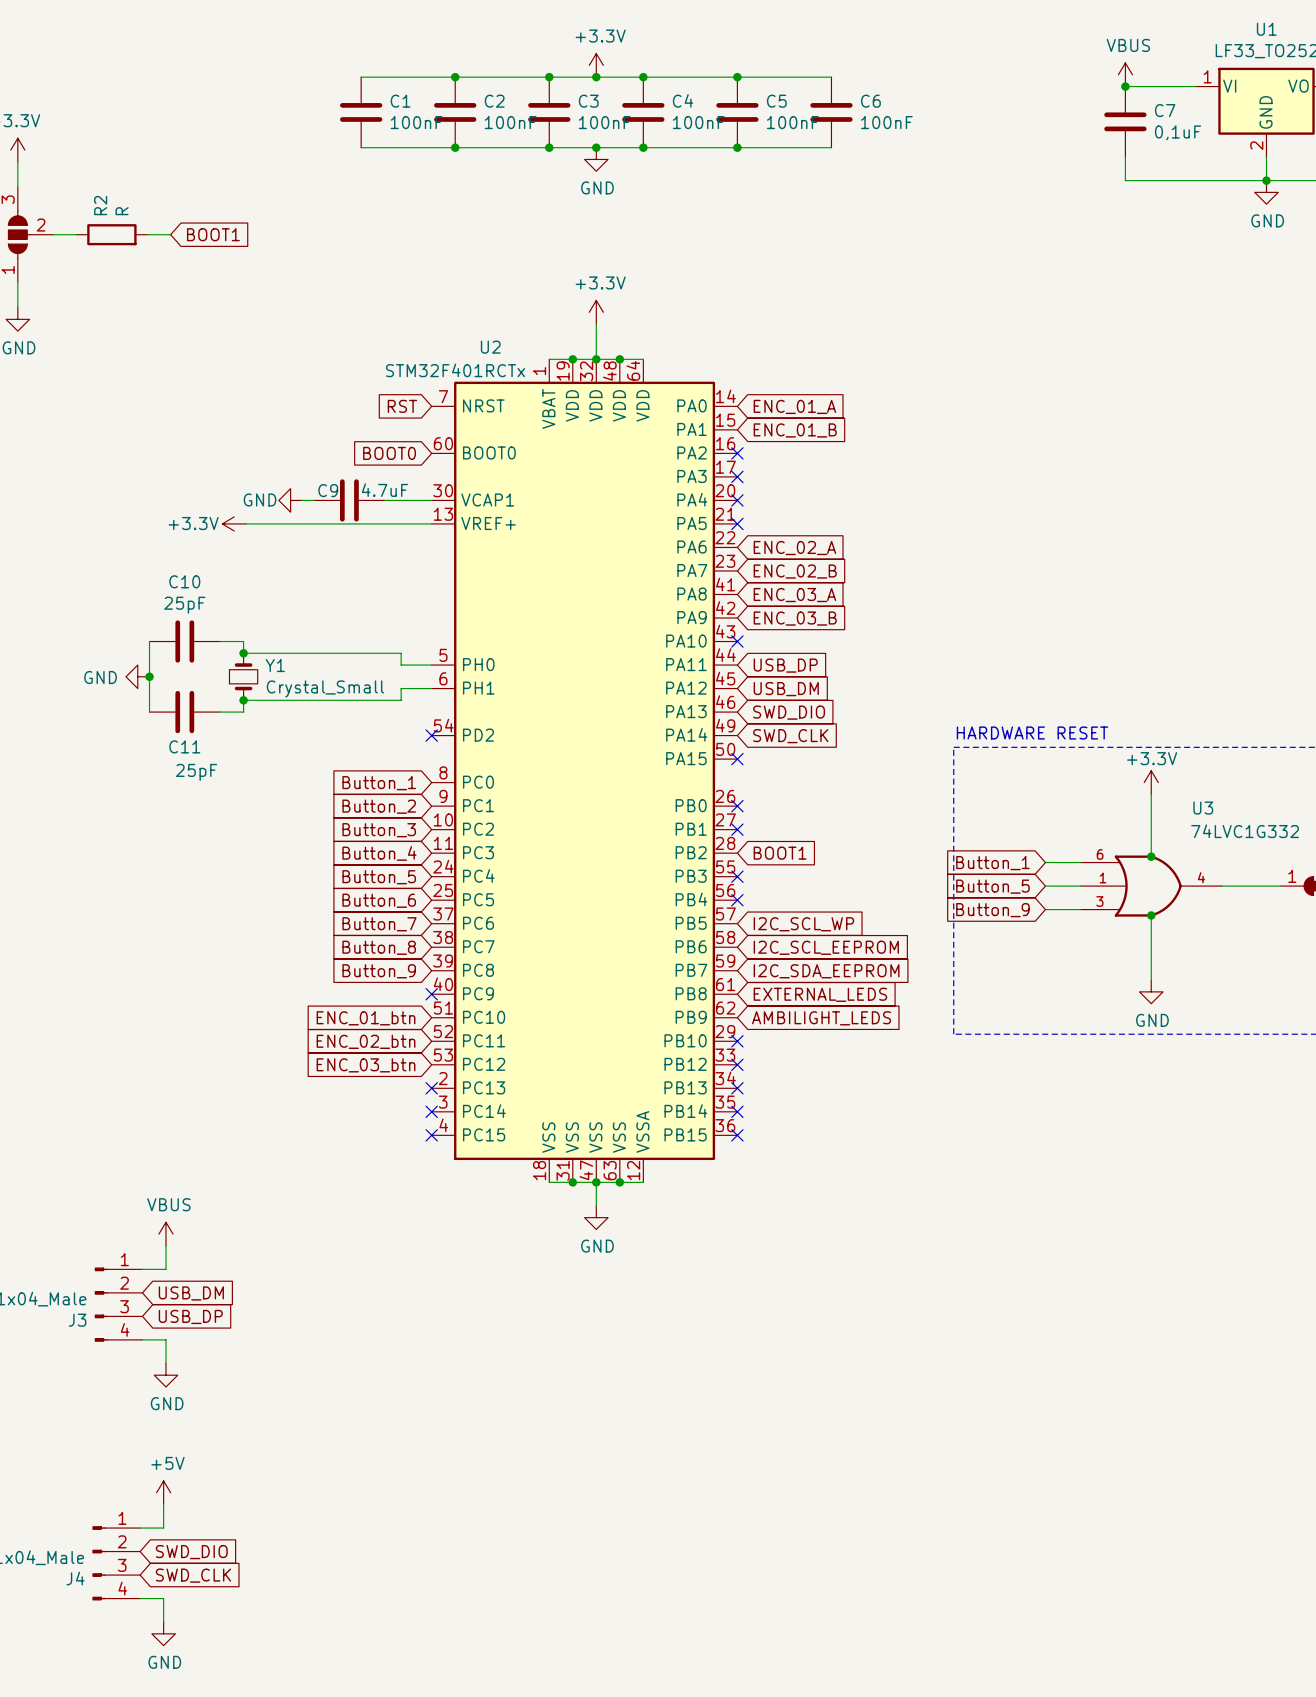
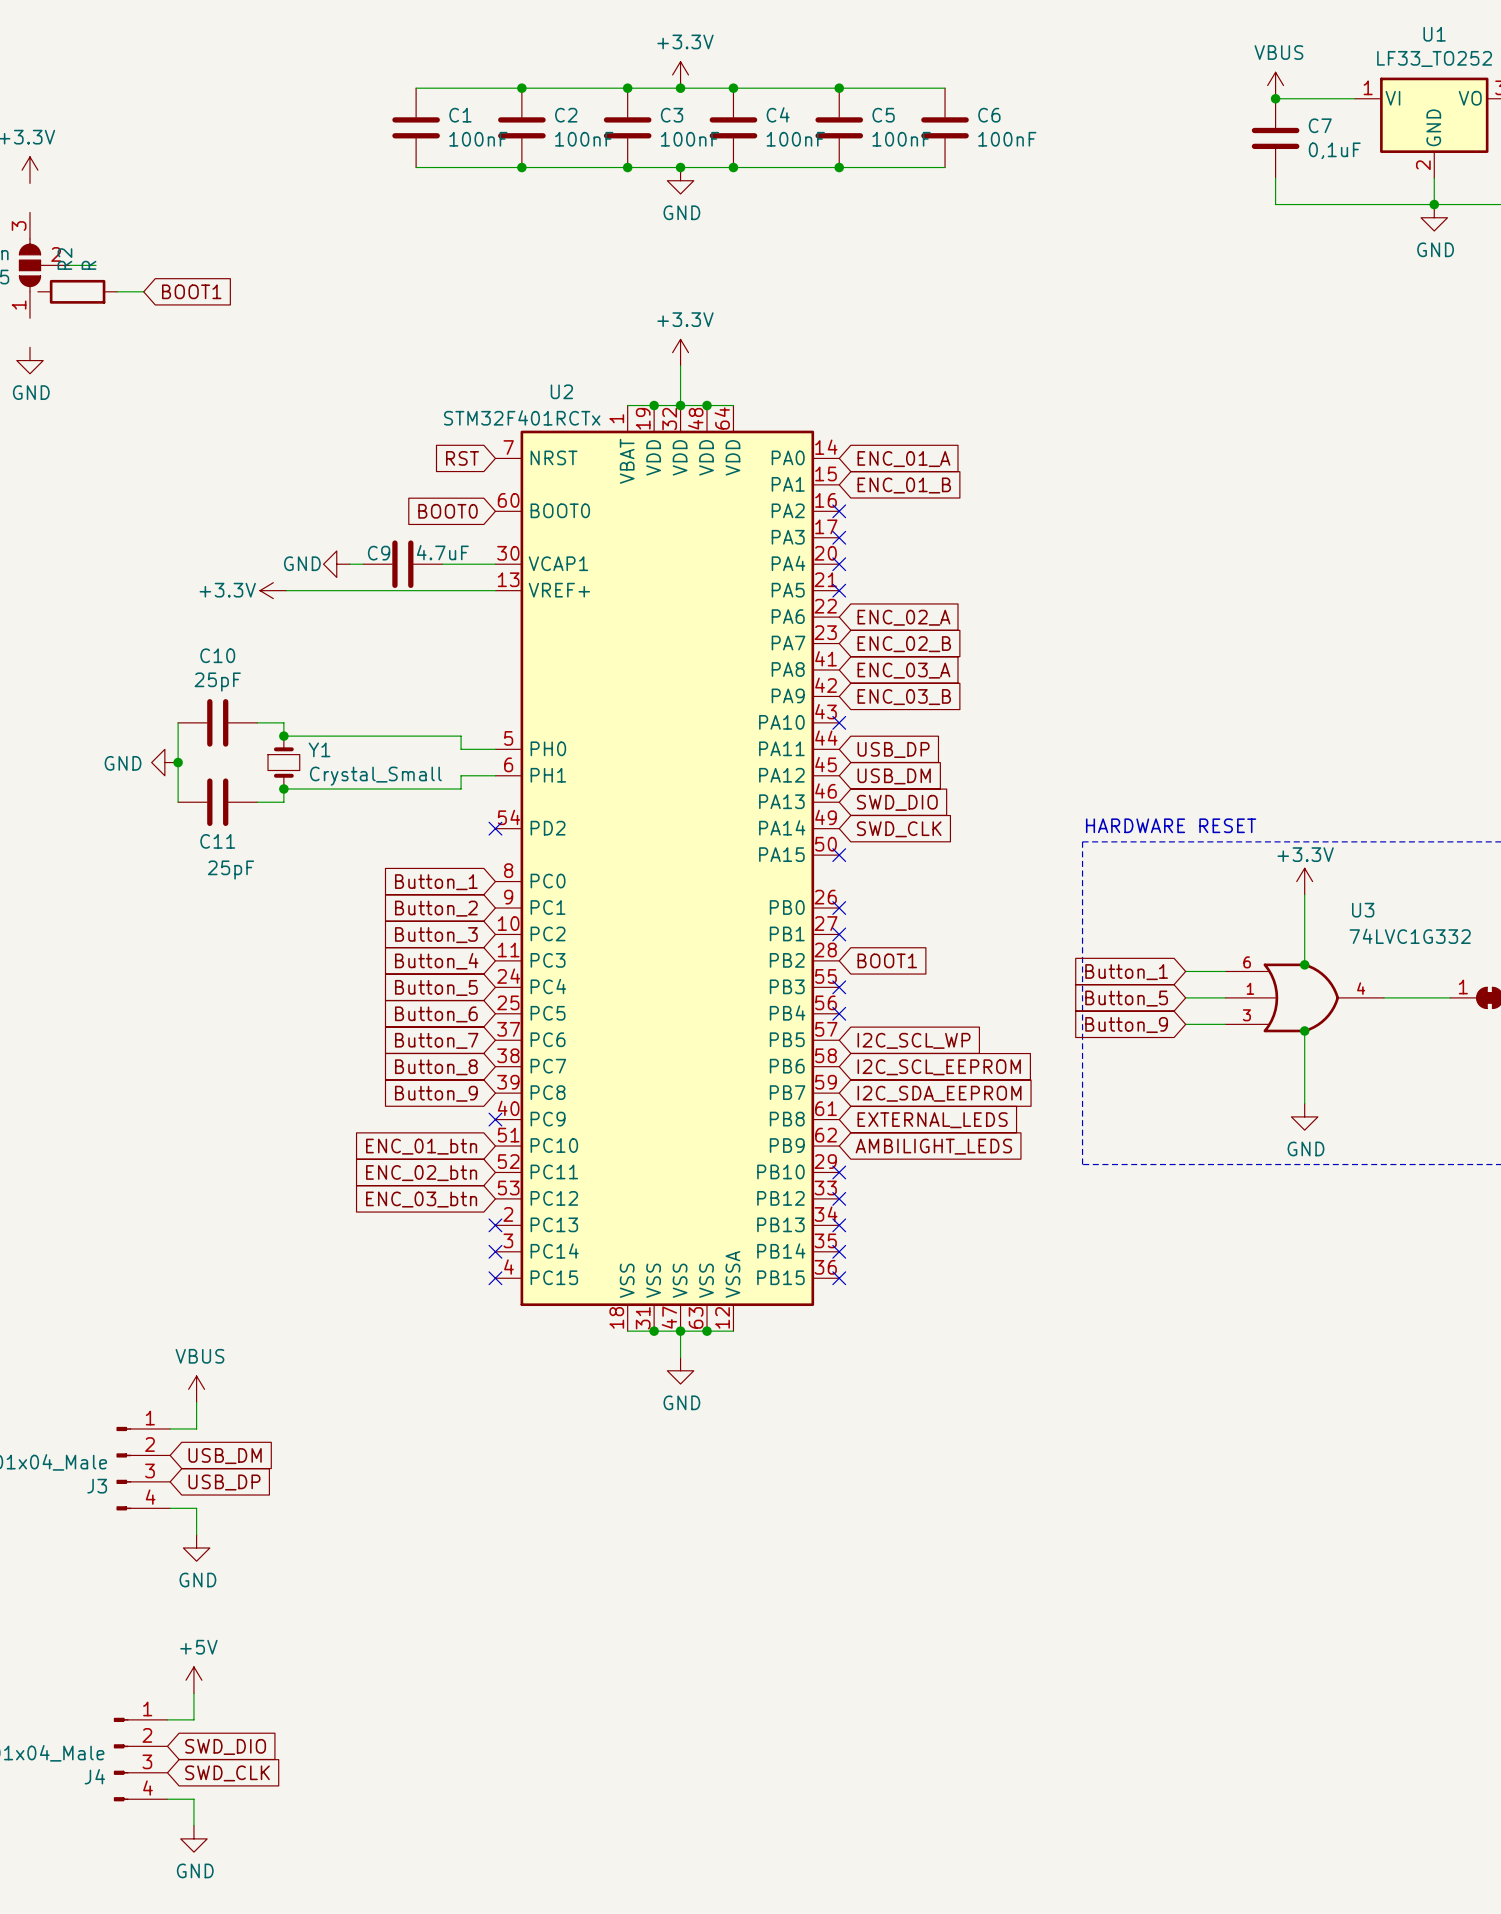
wire: (17, 161) (17, 187) -> none
R2 position: (111, 234) -> (77, 291)
wire: (147, 234) (170, 234) -> (117, 291) (143, 291)
global label position: BOOT1 (213, 234) -> BOOT1 (191, 291)
wire: (17, 281) (17, 307) -> none

